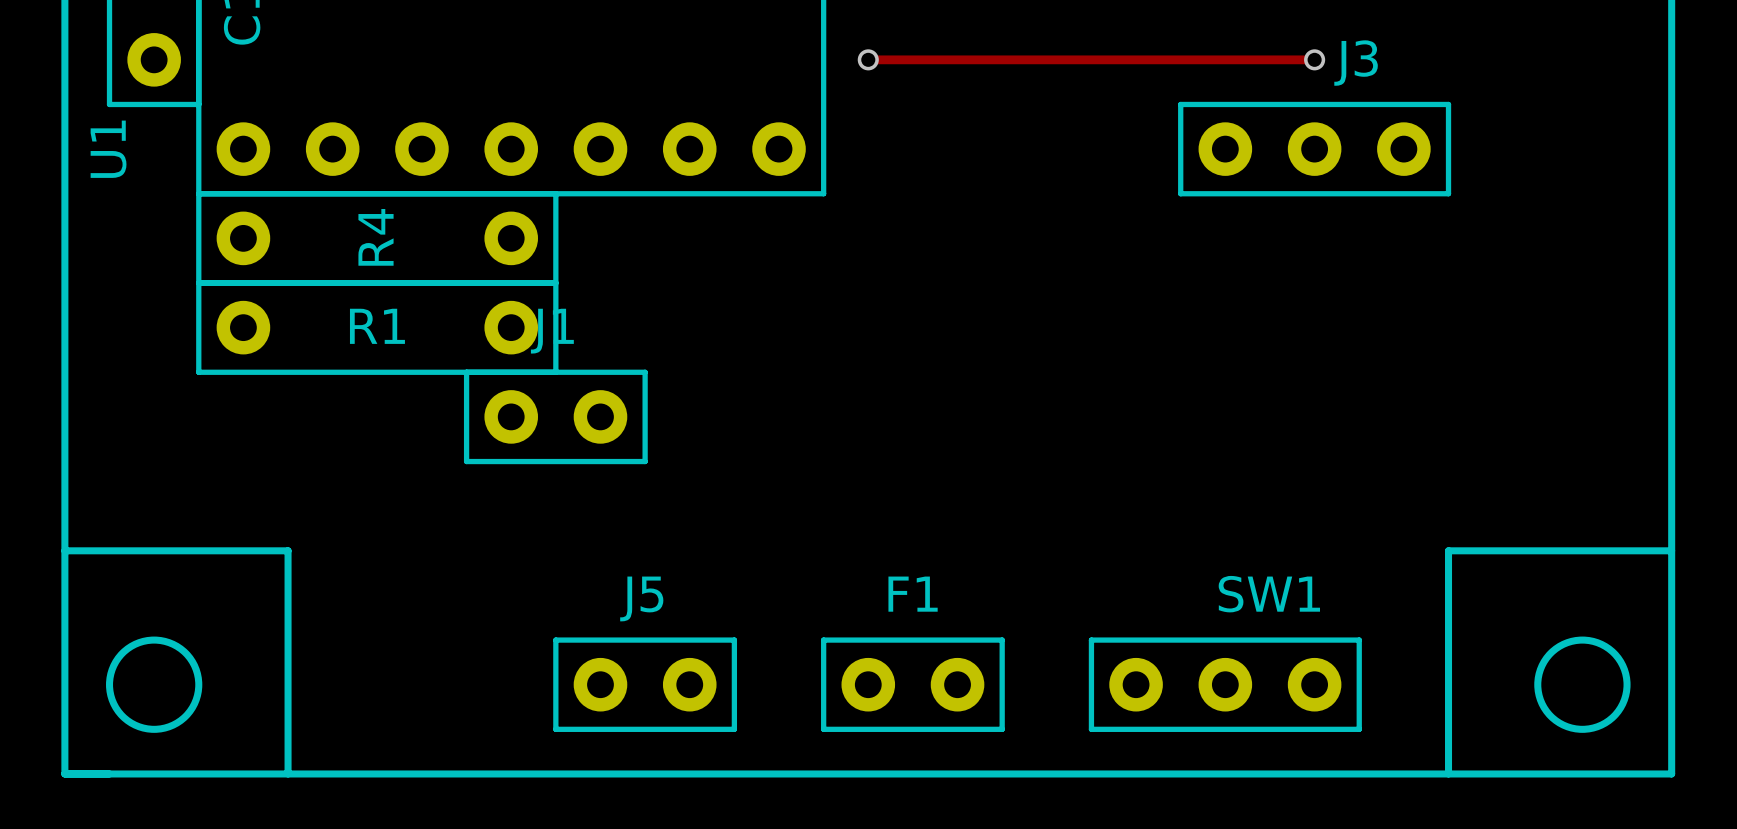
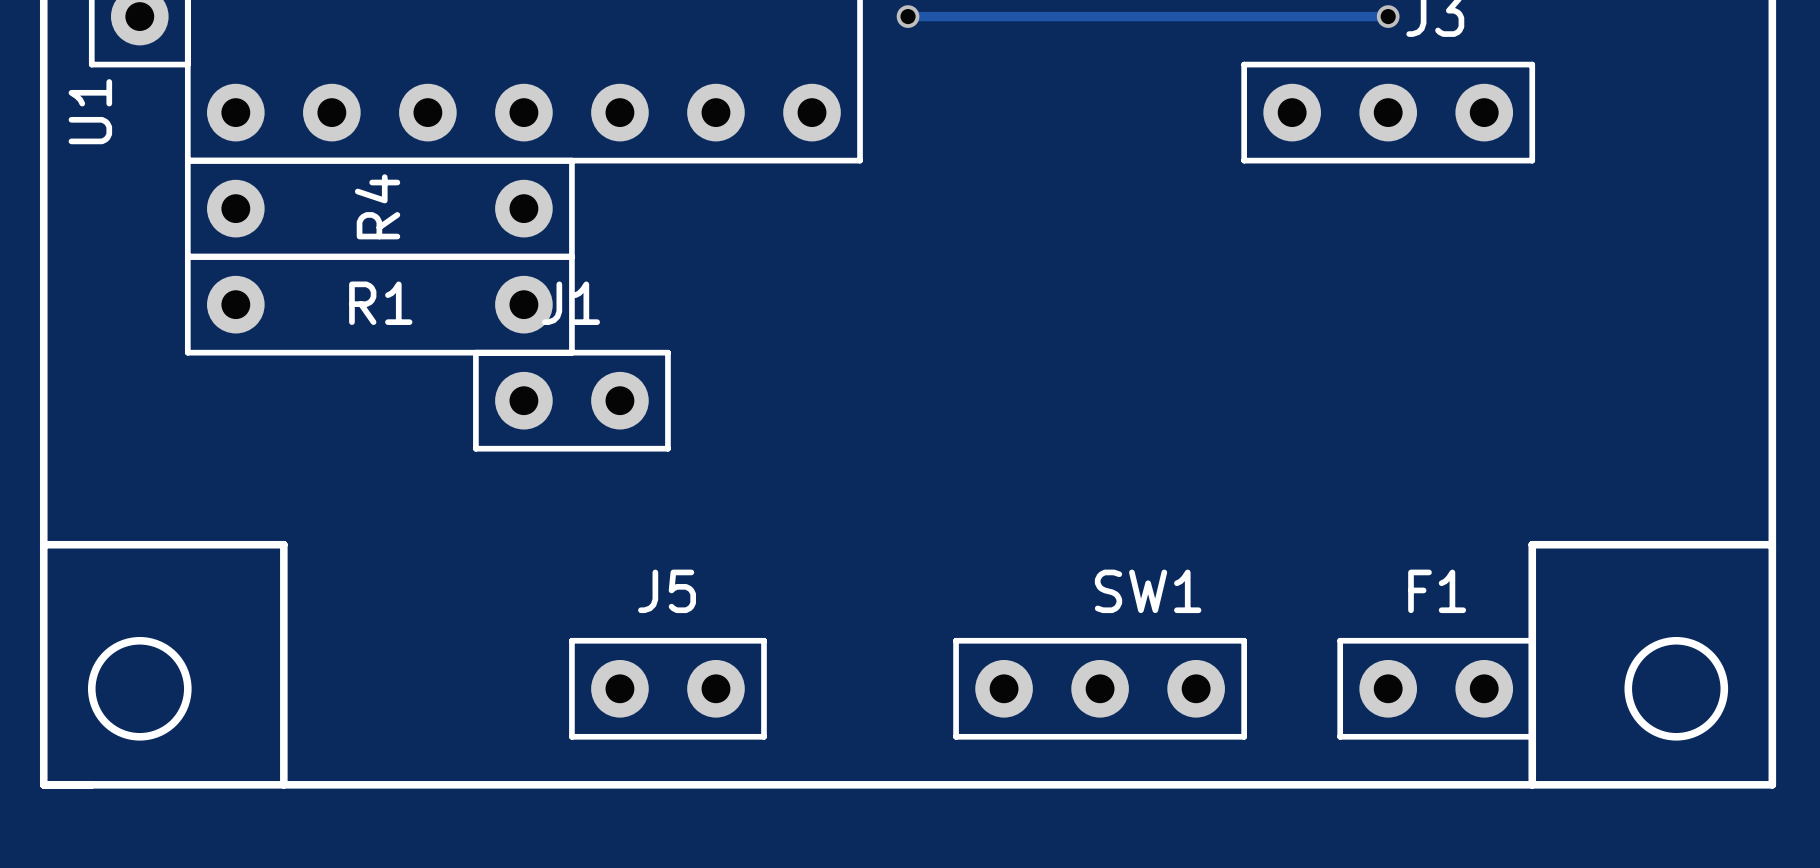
F1 position: (912, 684) -> (1436, 688)
SW1 position: (1225, 684) -> (1100, 688)

